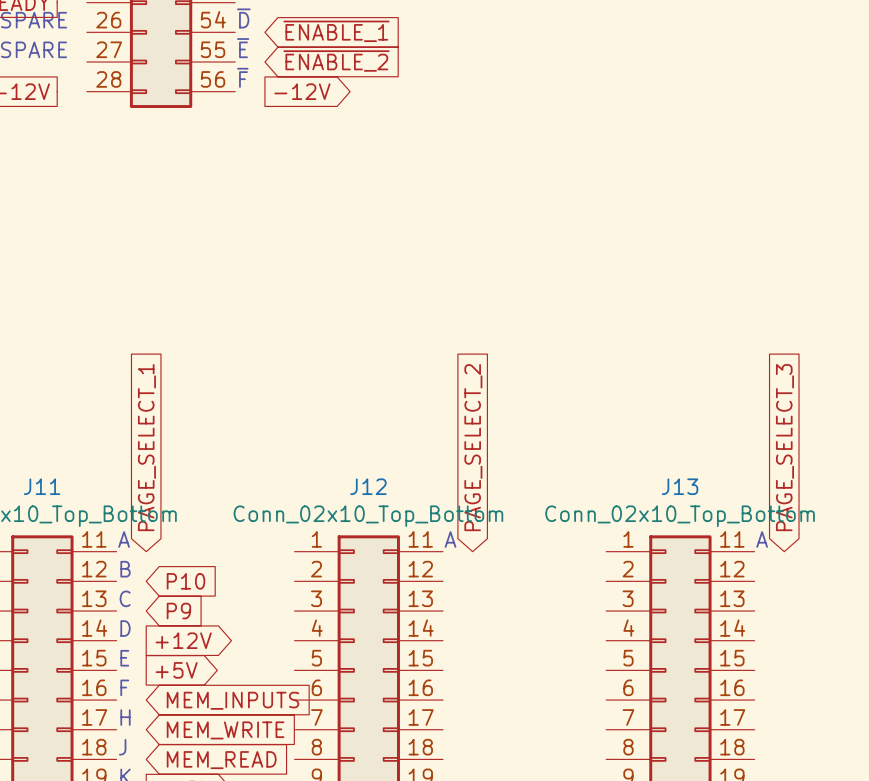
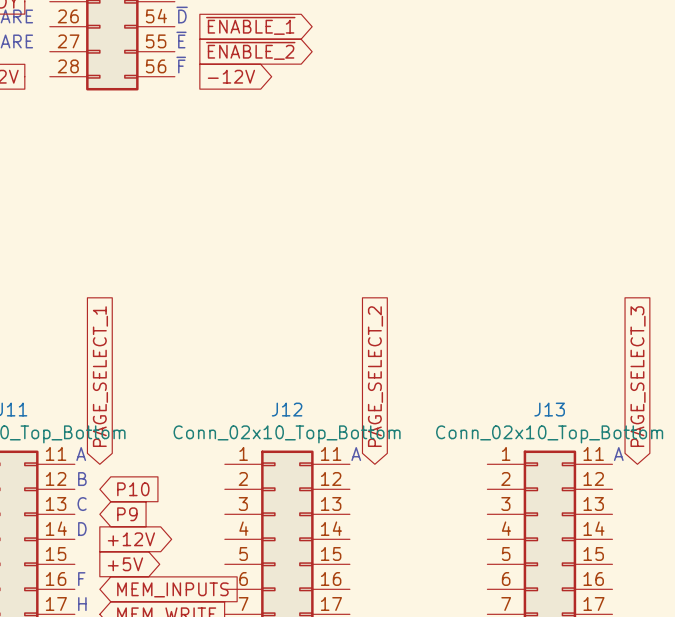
global label shape: input (336, 31) -> output (250, 25)
global label shape: input (336, 61) -> output (250, 50)
text: E (124, 658) -> none

